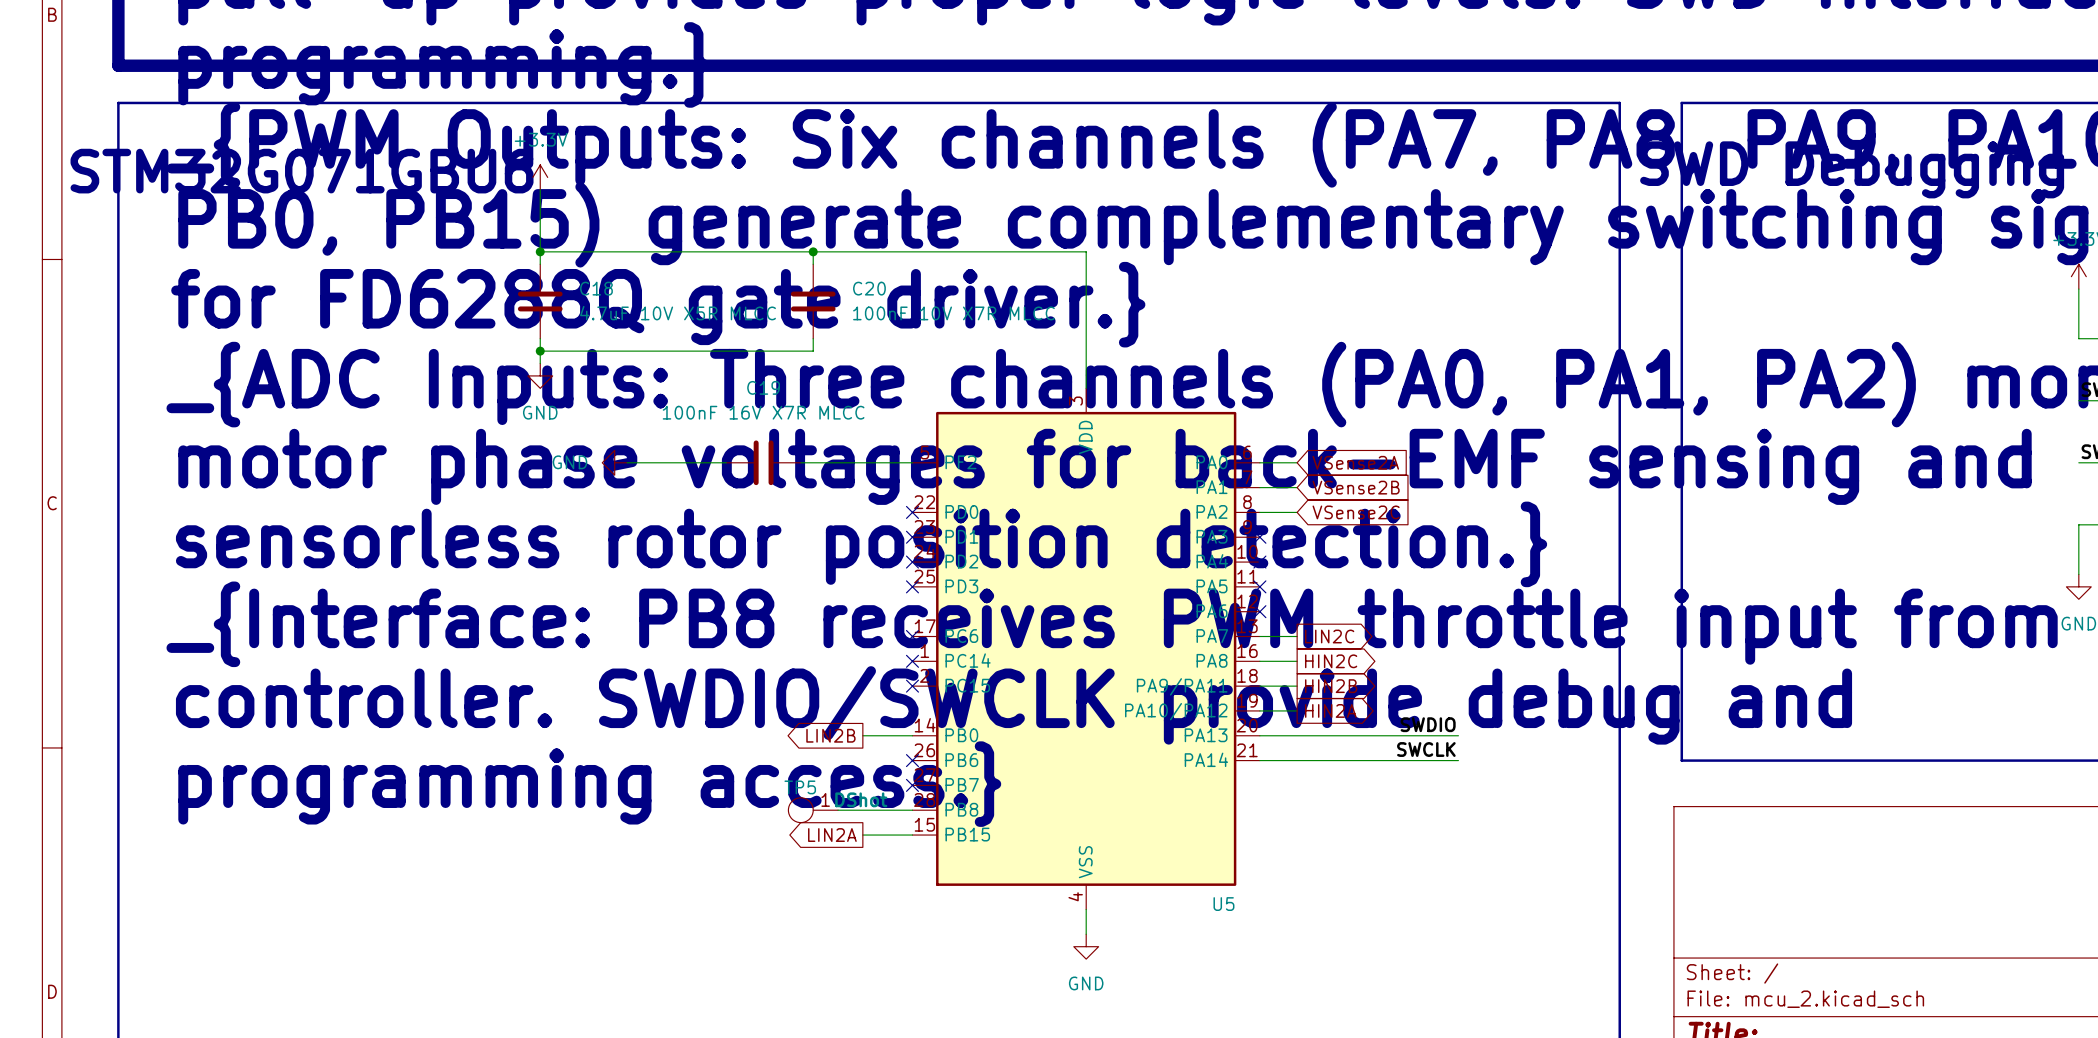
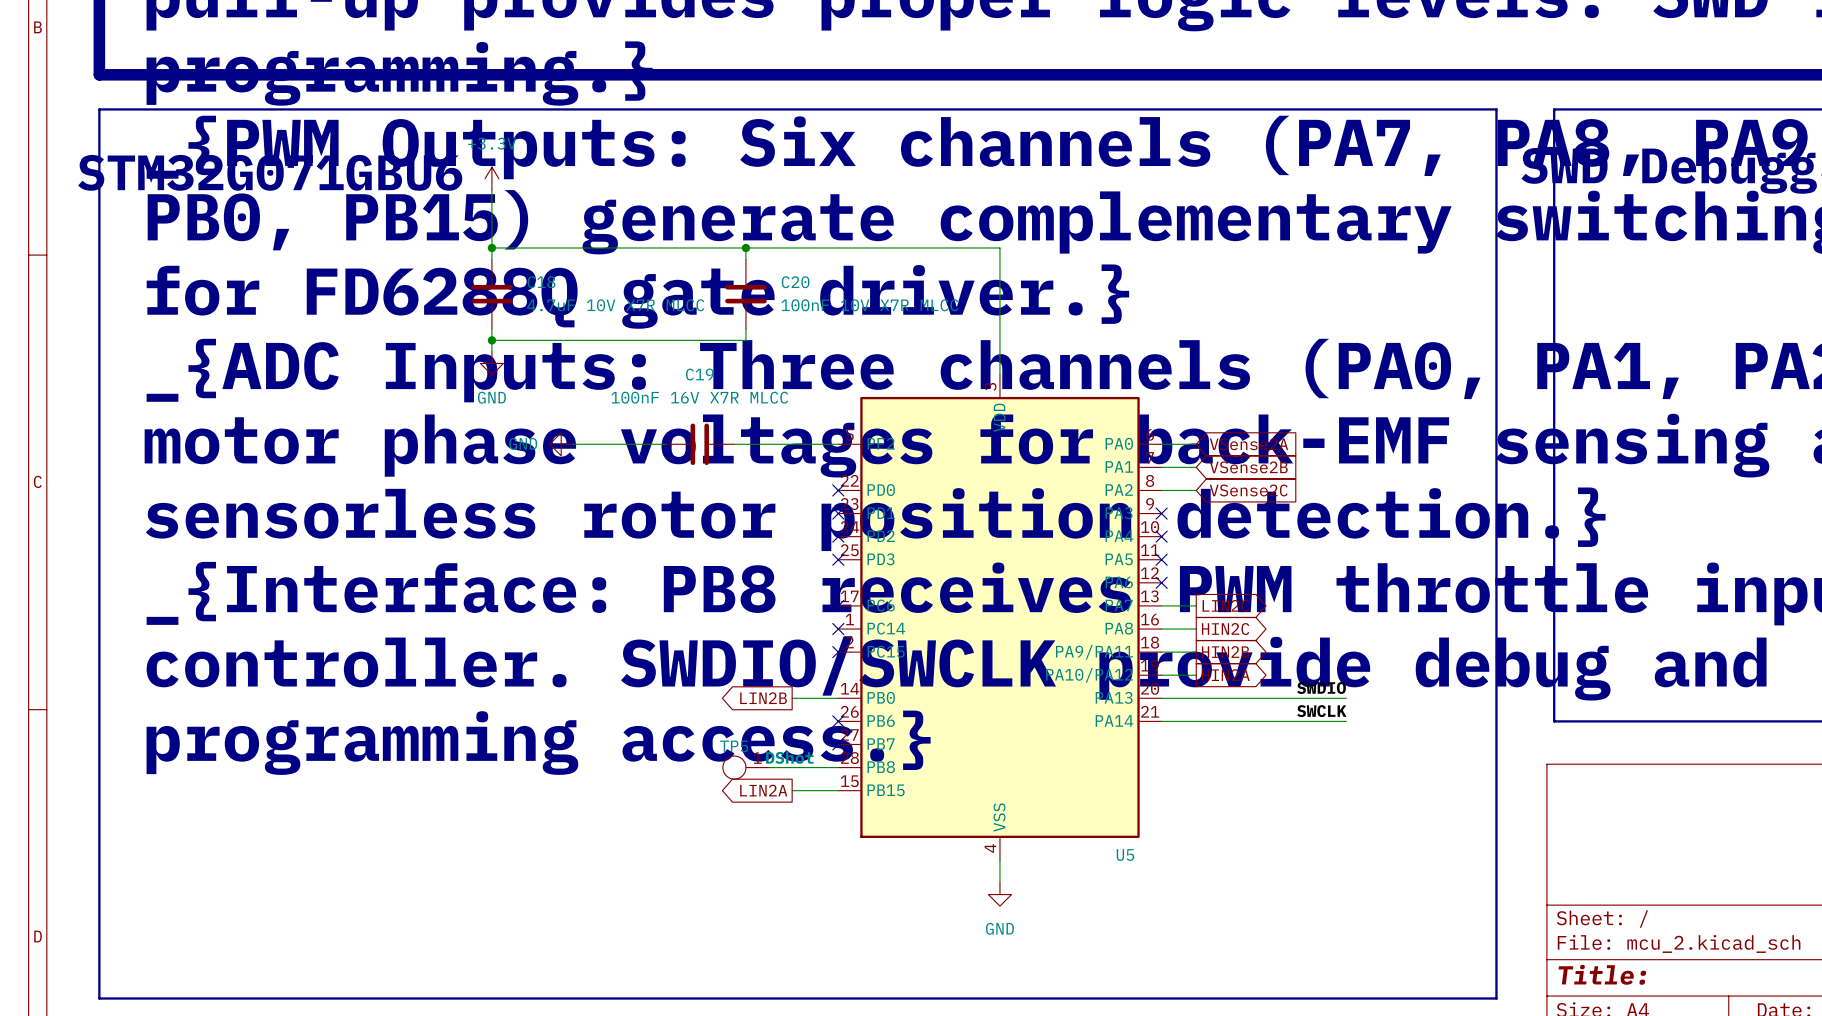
C18 value: 4.7uF 10V X5R MLCC (678, 313) -> 4.7uF 10V X7R MLCC (615, 305)

